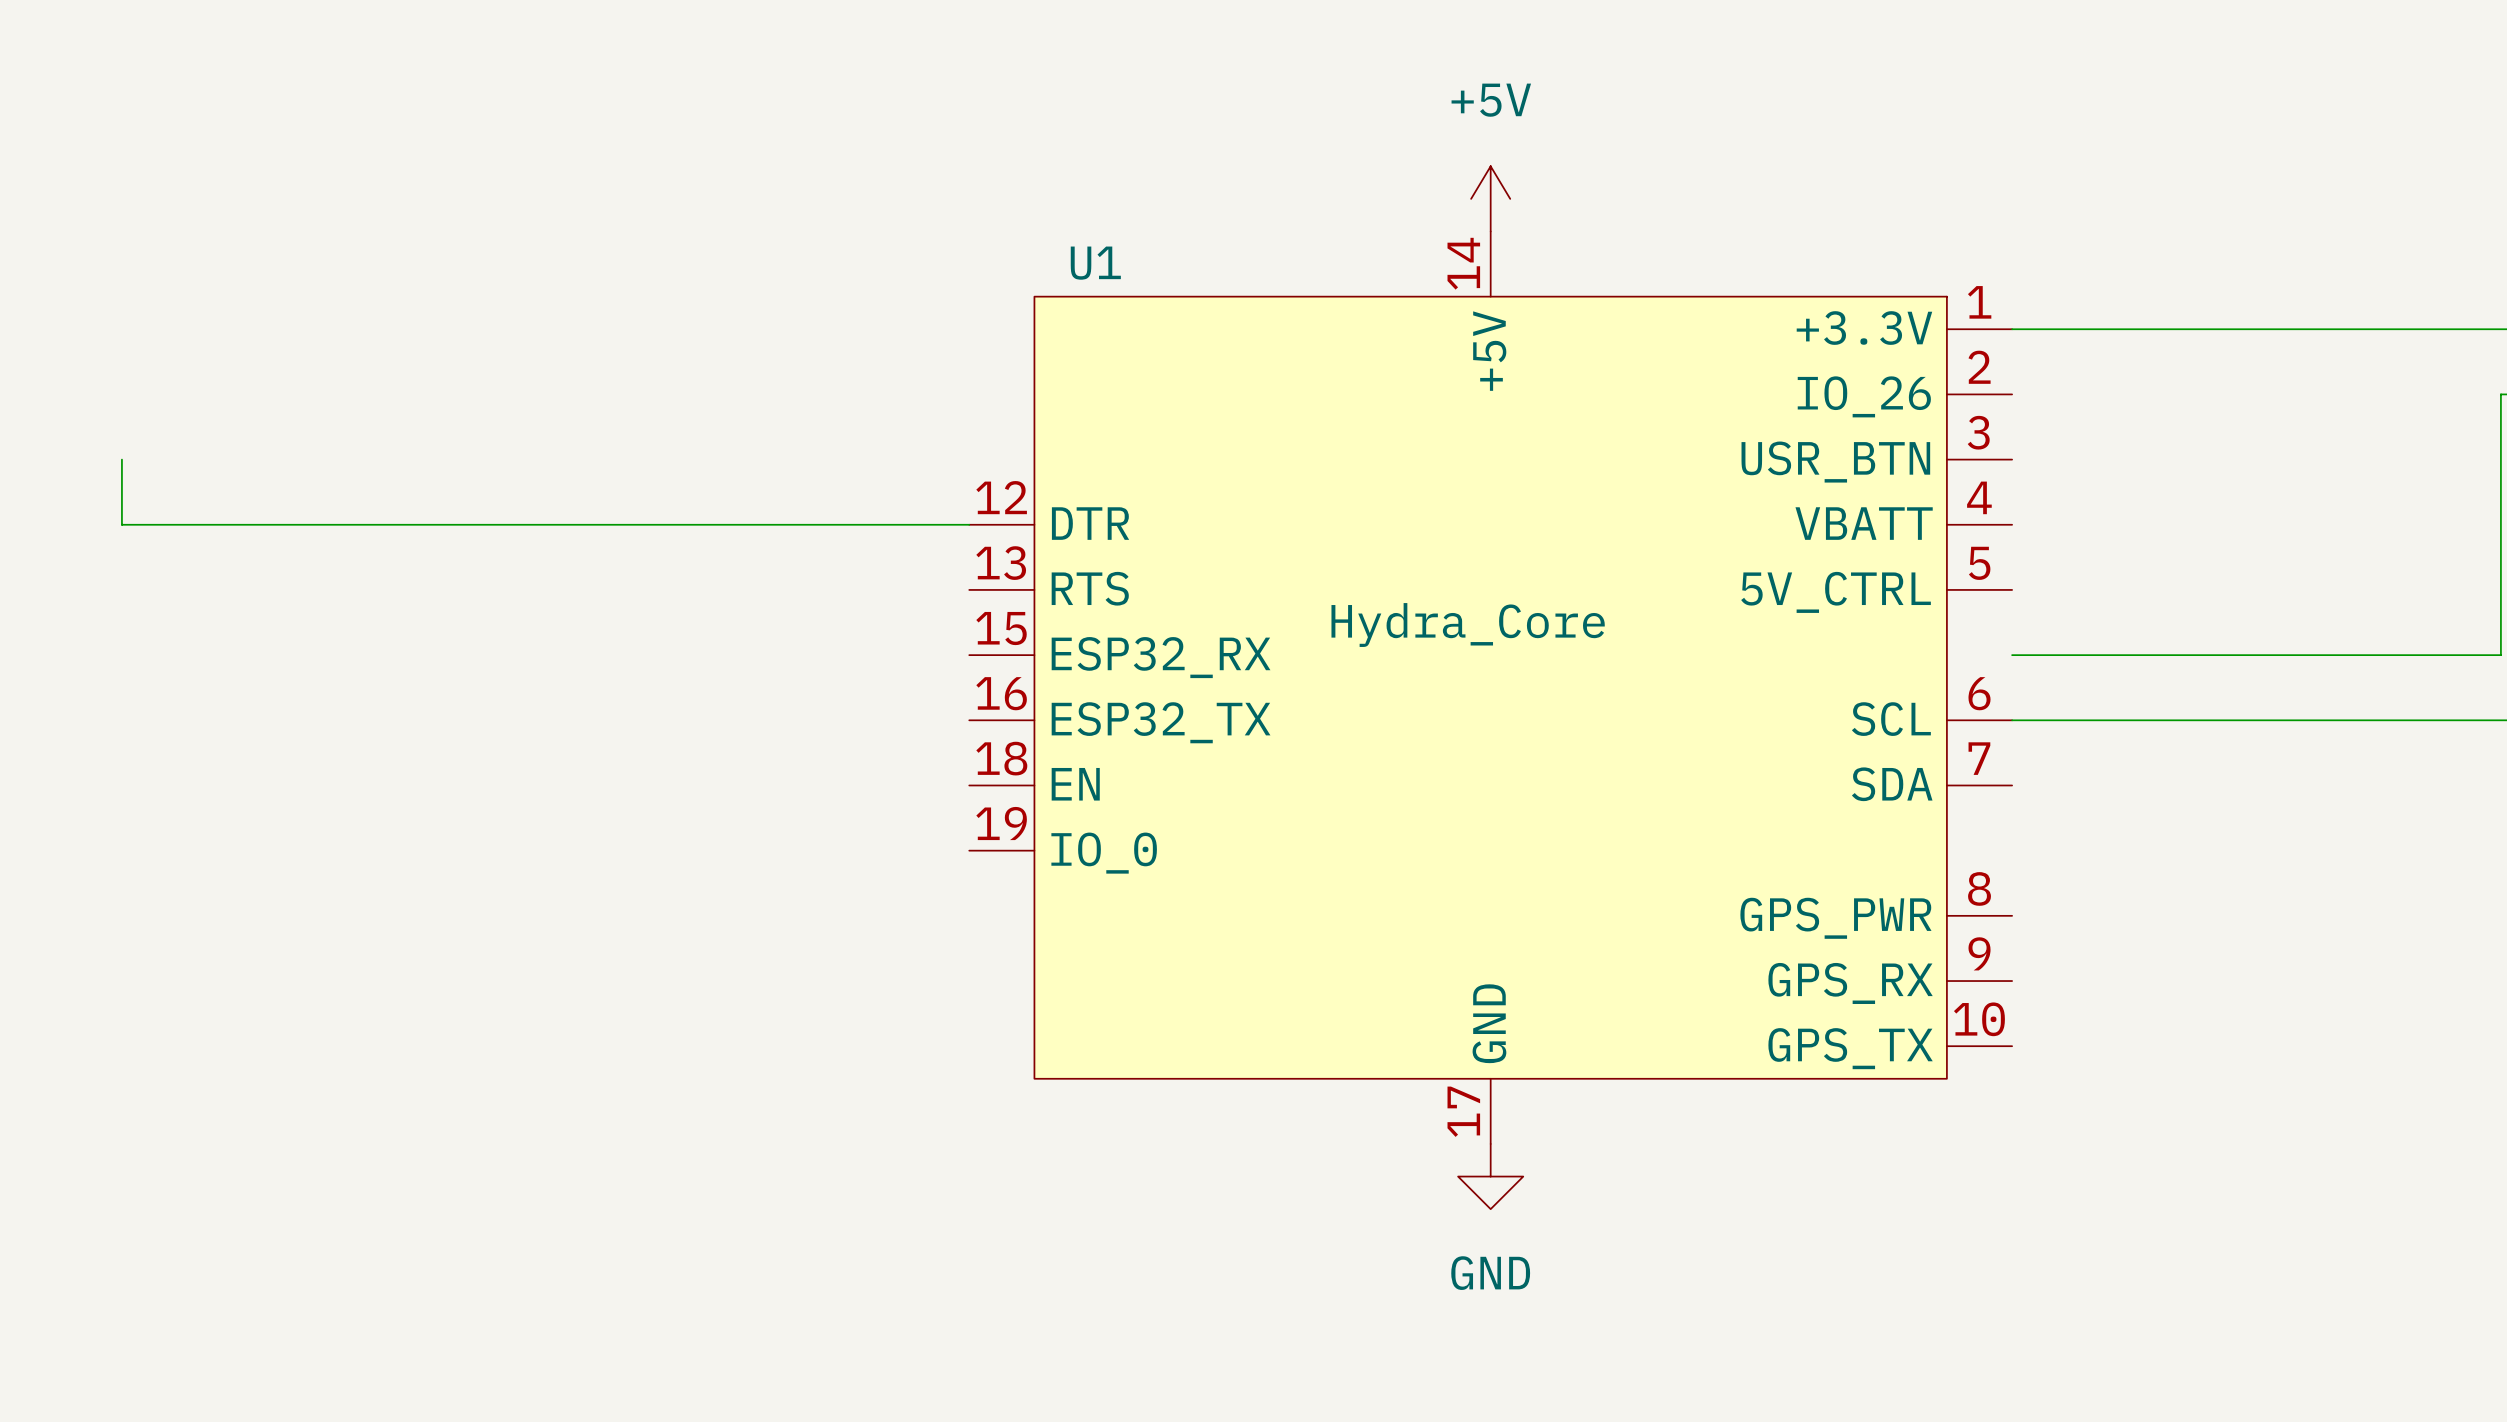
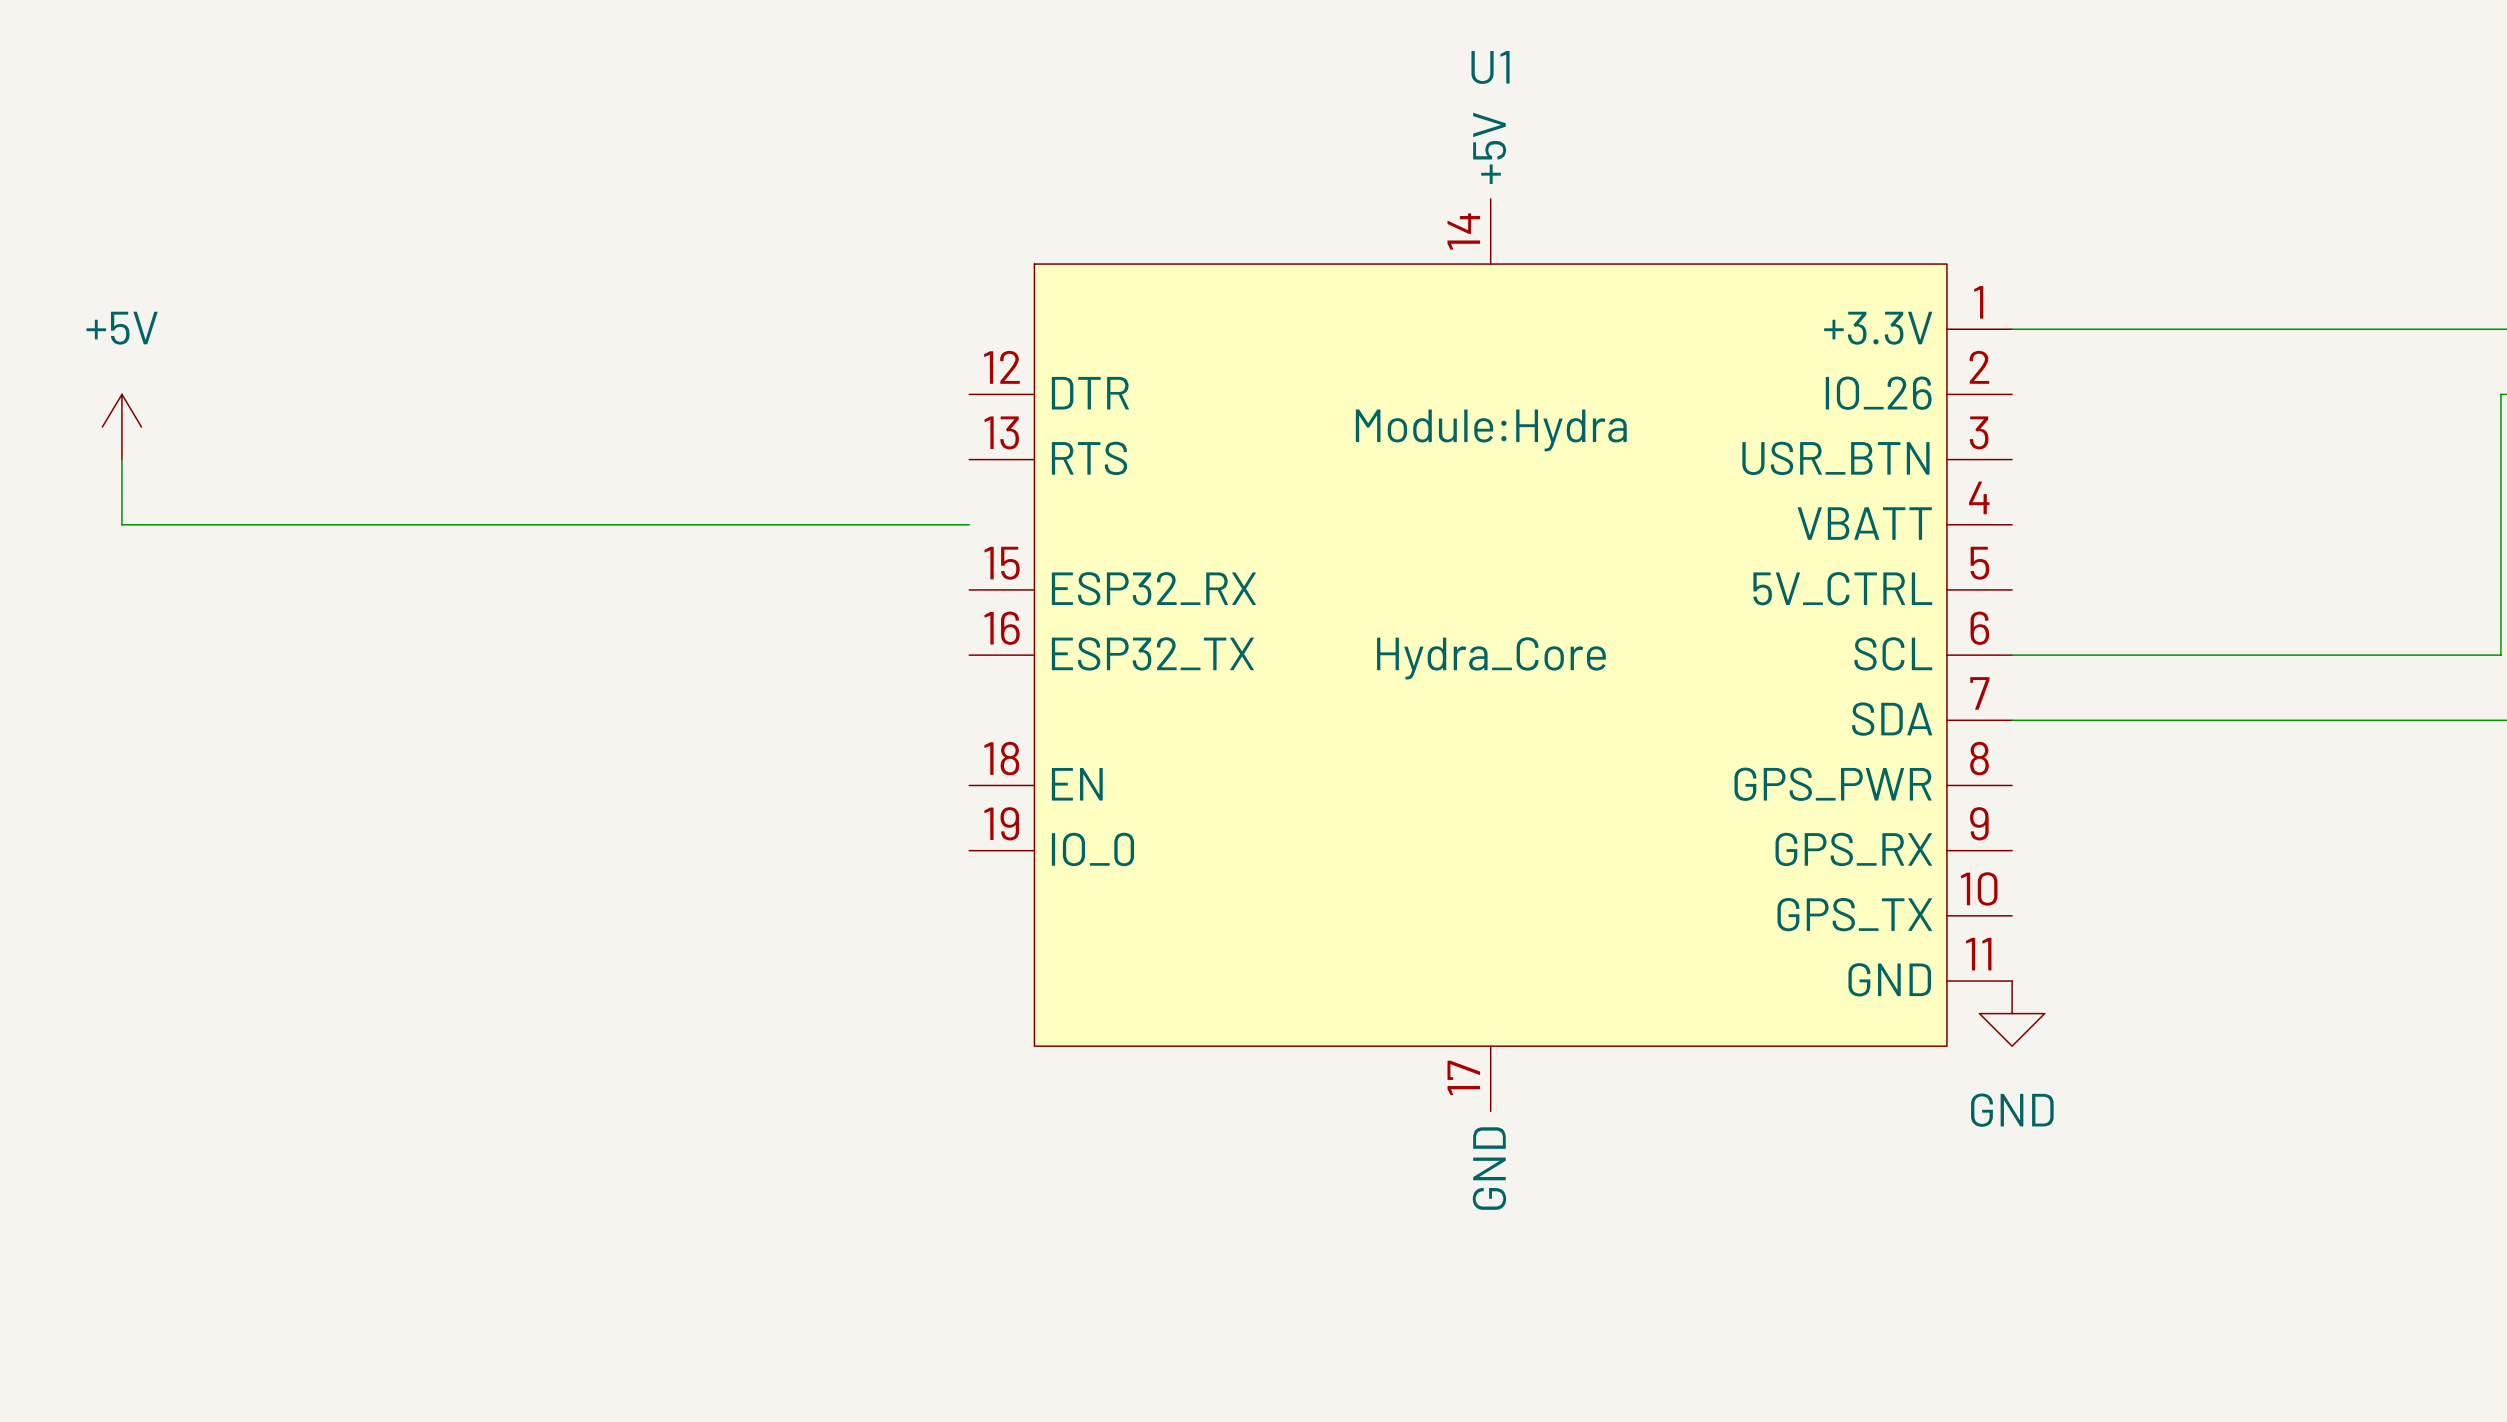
power symbol: +5V (1490, 198) -> none
U1 symbol: [969, 231, 2013, 1144] -> [969, 198, 2013, 1112]
U1 name position: U1 (1095, 263) -> U1 (1490, 67)
power symbol: none -> +5V (121, 427)
U1 text: none -> Module:Hydra (1491, 430)
U1 value position: Hydra_Core (1468, 625) -> Hydra_Core (1491, 658)
power symbol position: GND (1490, 1176) -> GND (2012, 1013)

